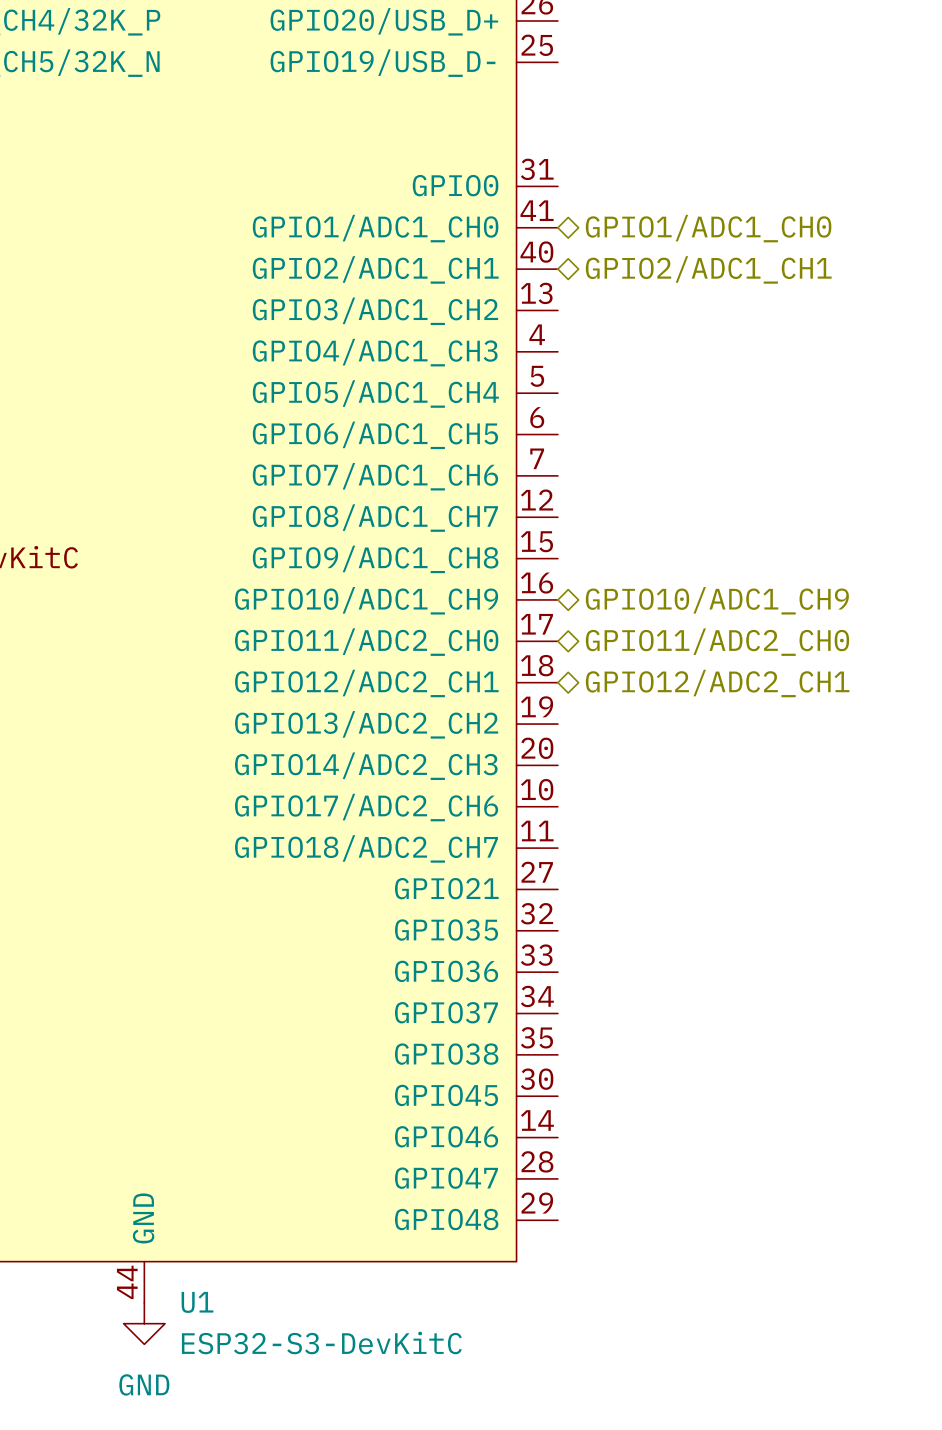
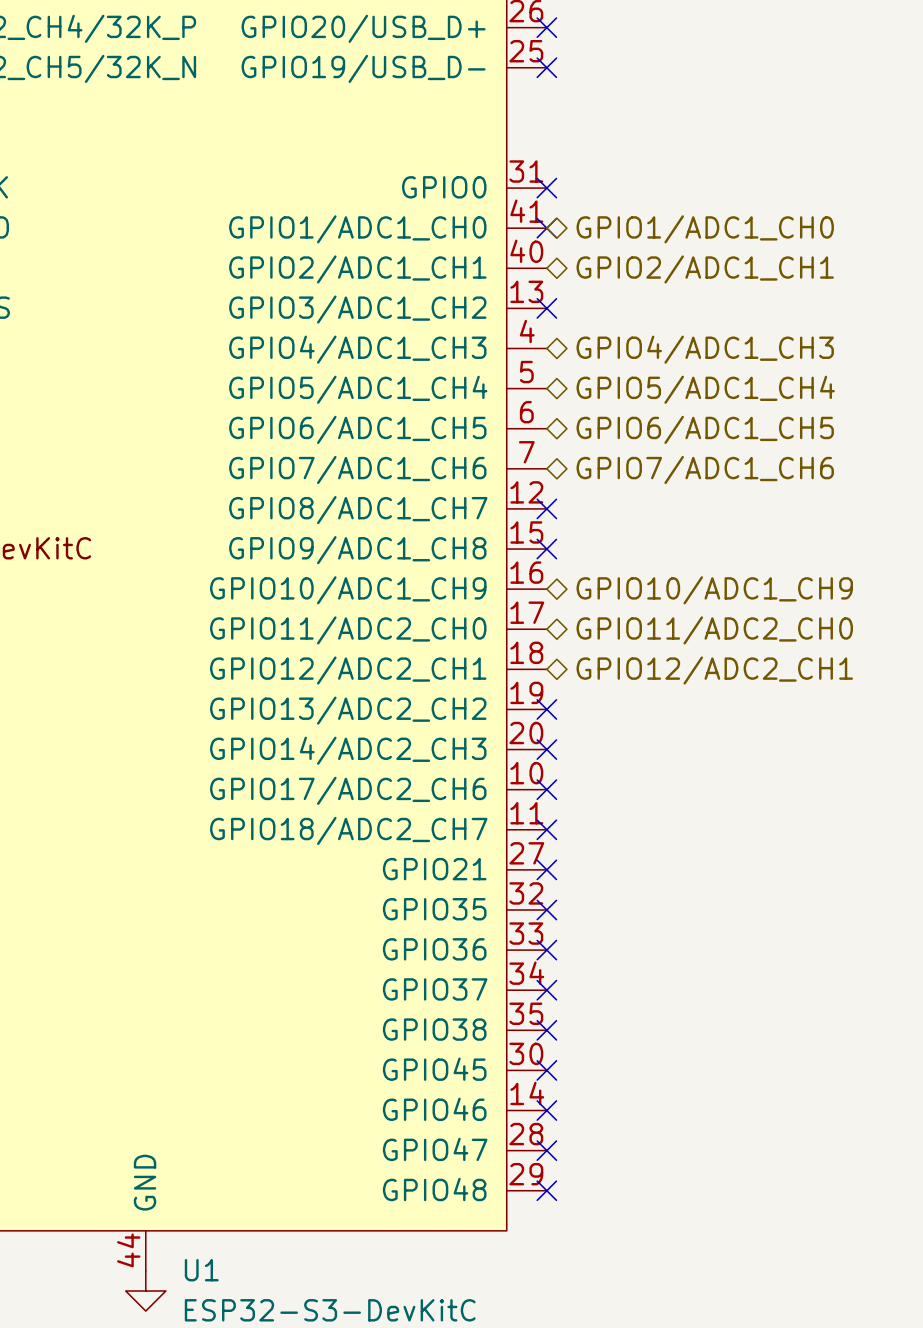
no-connect mark: none -> (546, 27)
no-connect mark: none -> (546, 67)
no-connect mark: none -> (546, 188)
no-connect mark: none -> (546, 228)
no-connect mark: none -> (546, 308)
hierarchical label: none -> GPIO4/ADC1_CH3 (705, 349)
hierarchical label: none -> GPIO5/ADC1_CH4 (705, 389)
hierarchical label: none -> GPIO6/ADC1_CH5 (705, 429)
hierarchical label: none -> GPIO7/ADC1_CH6 (705, 469)
no-connect mark: none -> (546, 508)
no-connect mark: none -> (546, 549)
no-connect mark: none -> (546, 709)
no-connect mark: none -> (546, 749)
no-connect mark: none -> (546, 789)
no-connect mark: none -> (546, 829)
no-connect mark: none -> (546, 869)
no-connect mark: none -> (546, 909)
no-connect mark: none -> (546, 950)
no-connect mark: none -> (546, 990)
no-connect mark: none -> (546, 1030)
no-connect mark: none -> (546, 1070)
no-connect mark: none -> (546, 1110)
no-connect mark: none -> (546, 1150)
no-connect mark: none -> (546, 1190)

